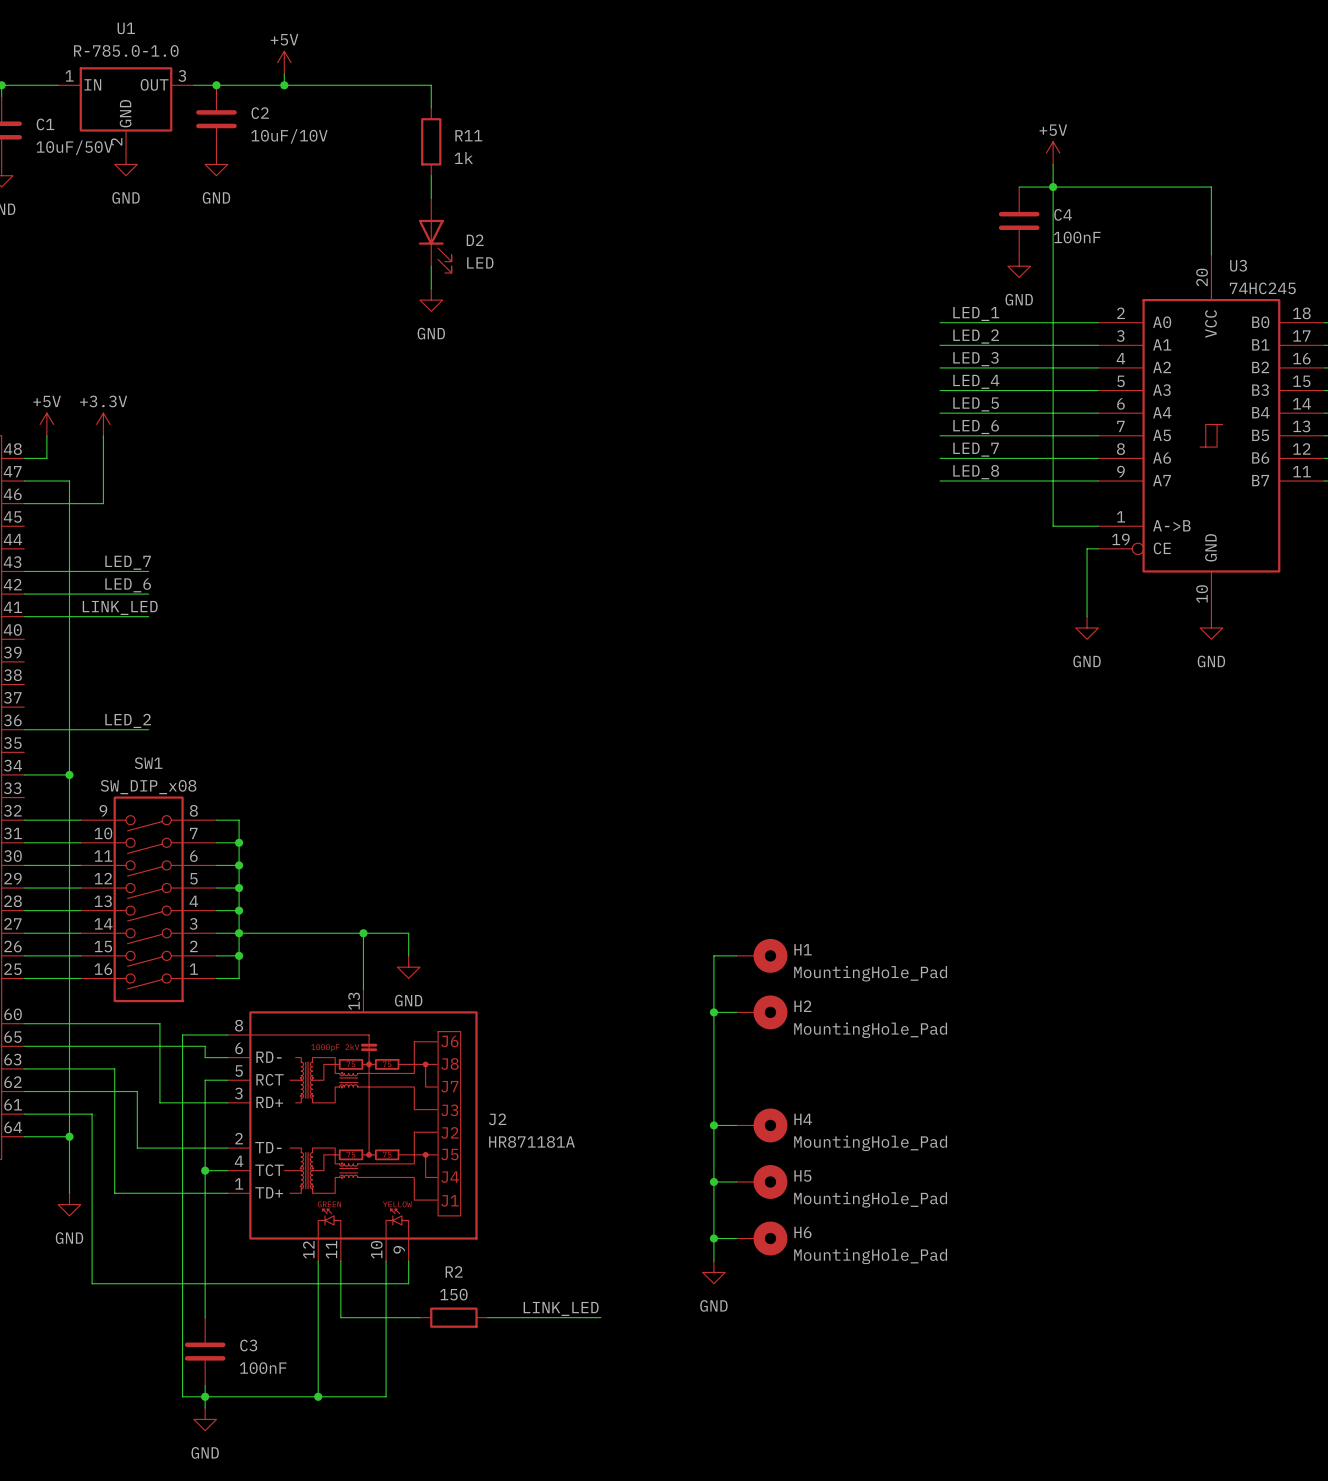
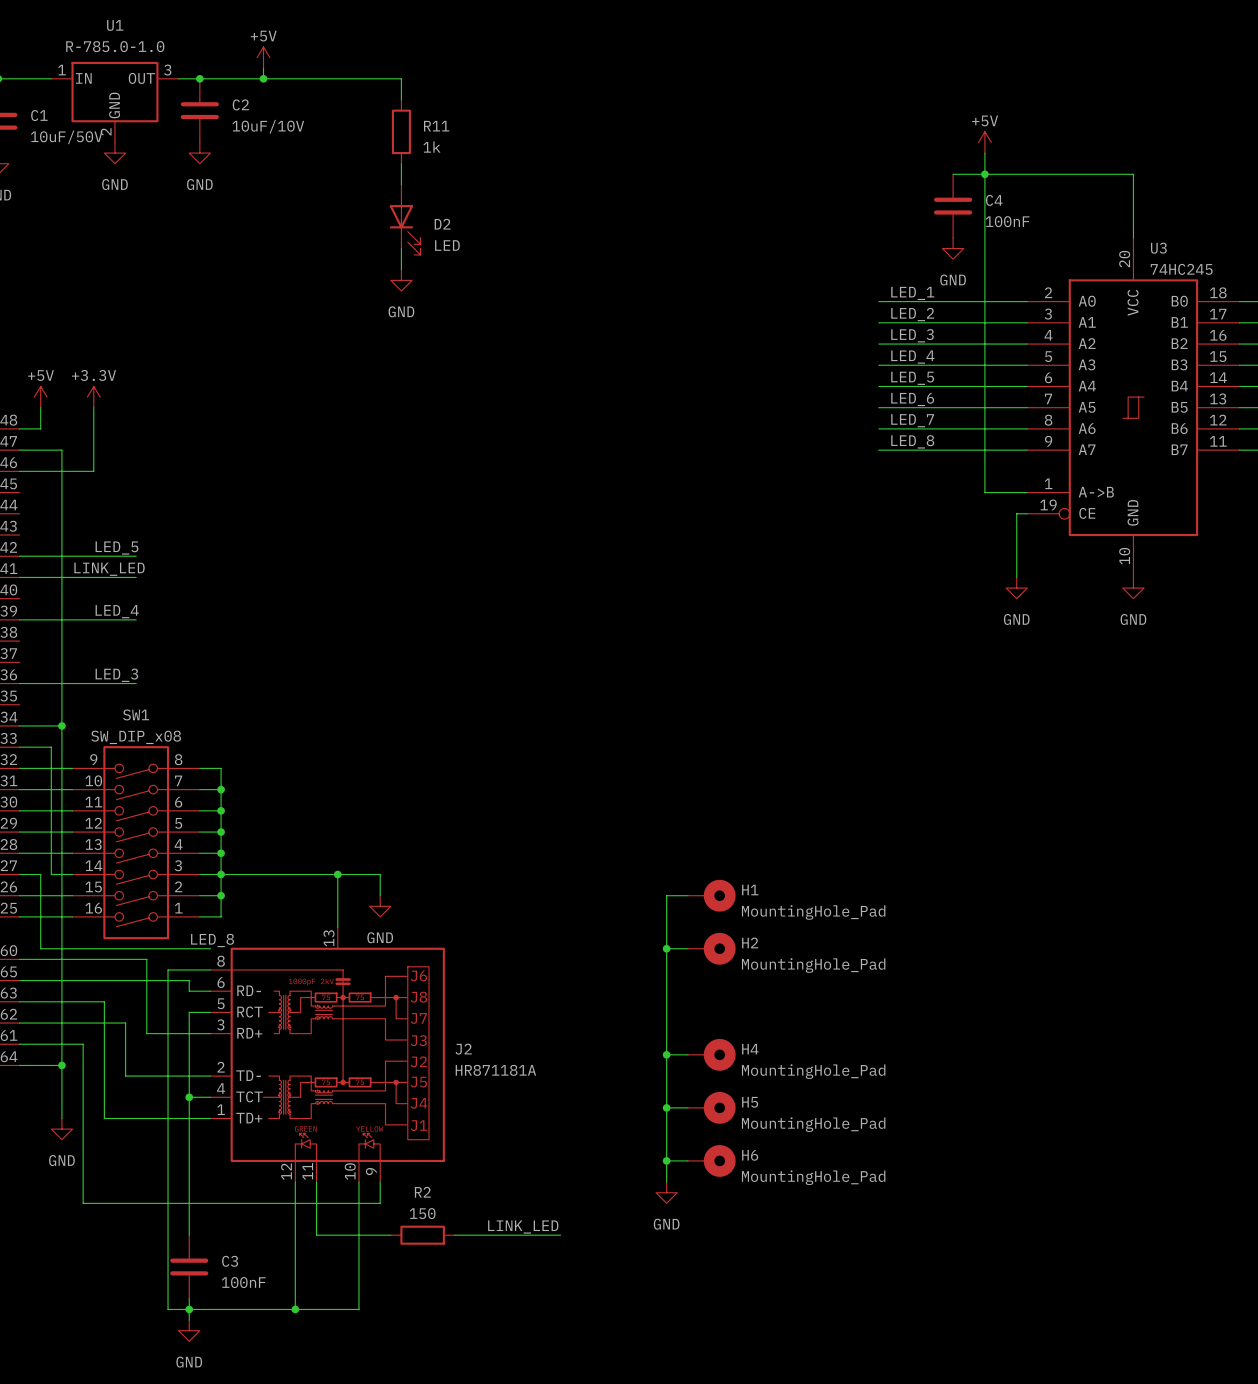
label: LED_7 (128, 562) -> none
wire: (24, 571) (148, 571) -> (19, 619) (136, 619)
label: LED_6 (128, 585) -> LED_5 (116, 548)
label: none -> LED_4 (117, 611)
label: LED_2 (128, 720) -> LED_3 (116, 675)
wire: (46, 933) (58, 933) -> (19, 747) (51, 747) (51, 874)
wire: none -> (40, 874) (40, 948) (210, 948)
label: none -> LED_8 (212, 940)

